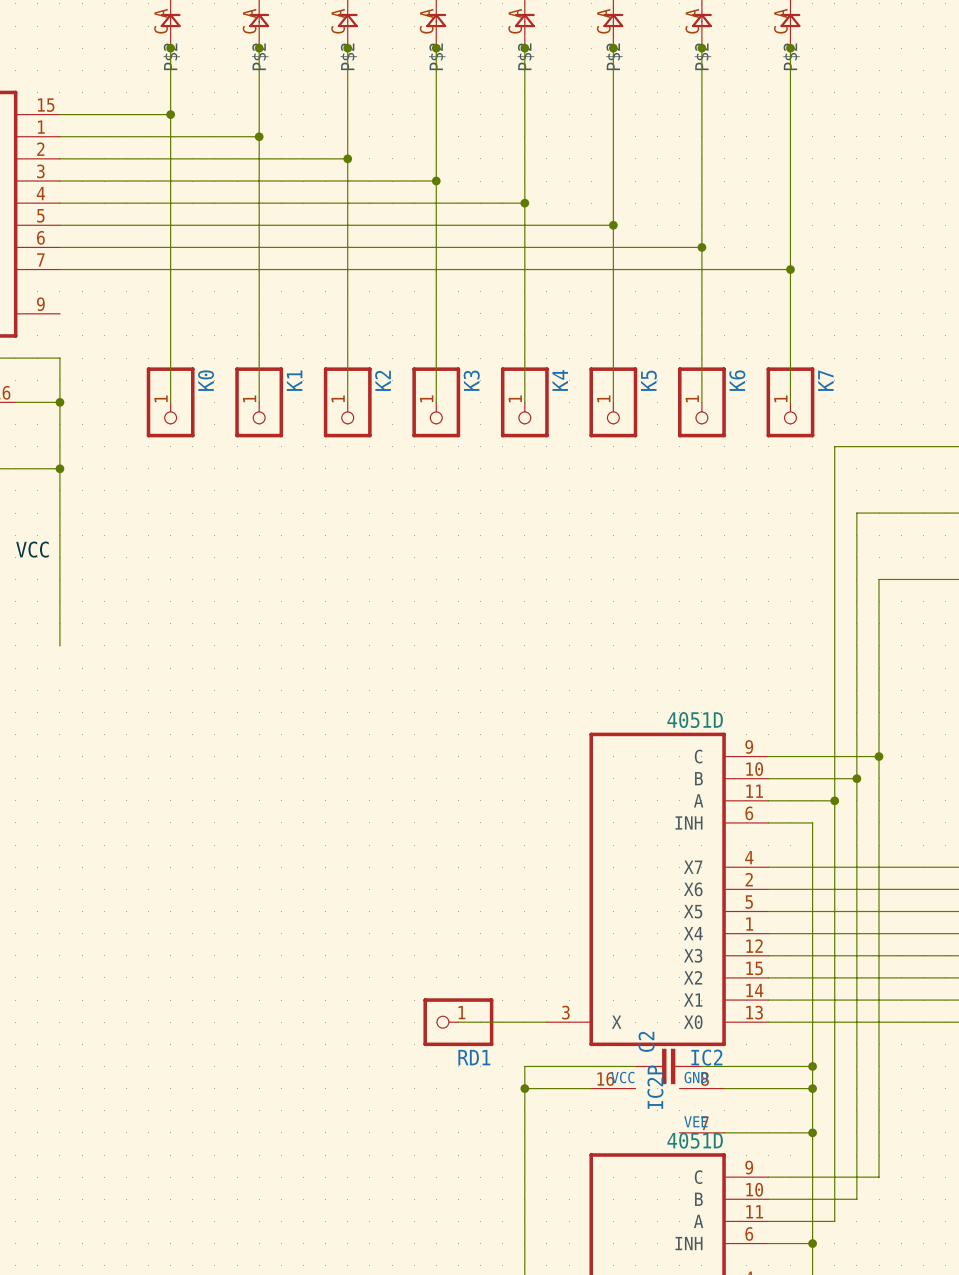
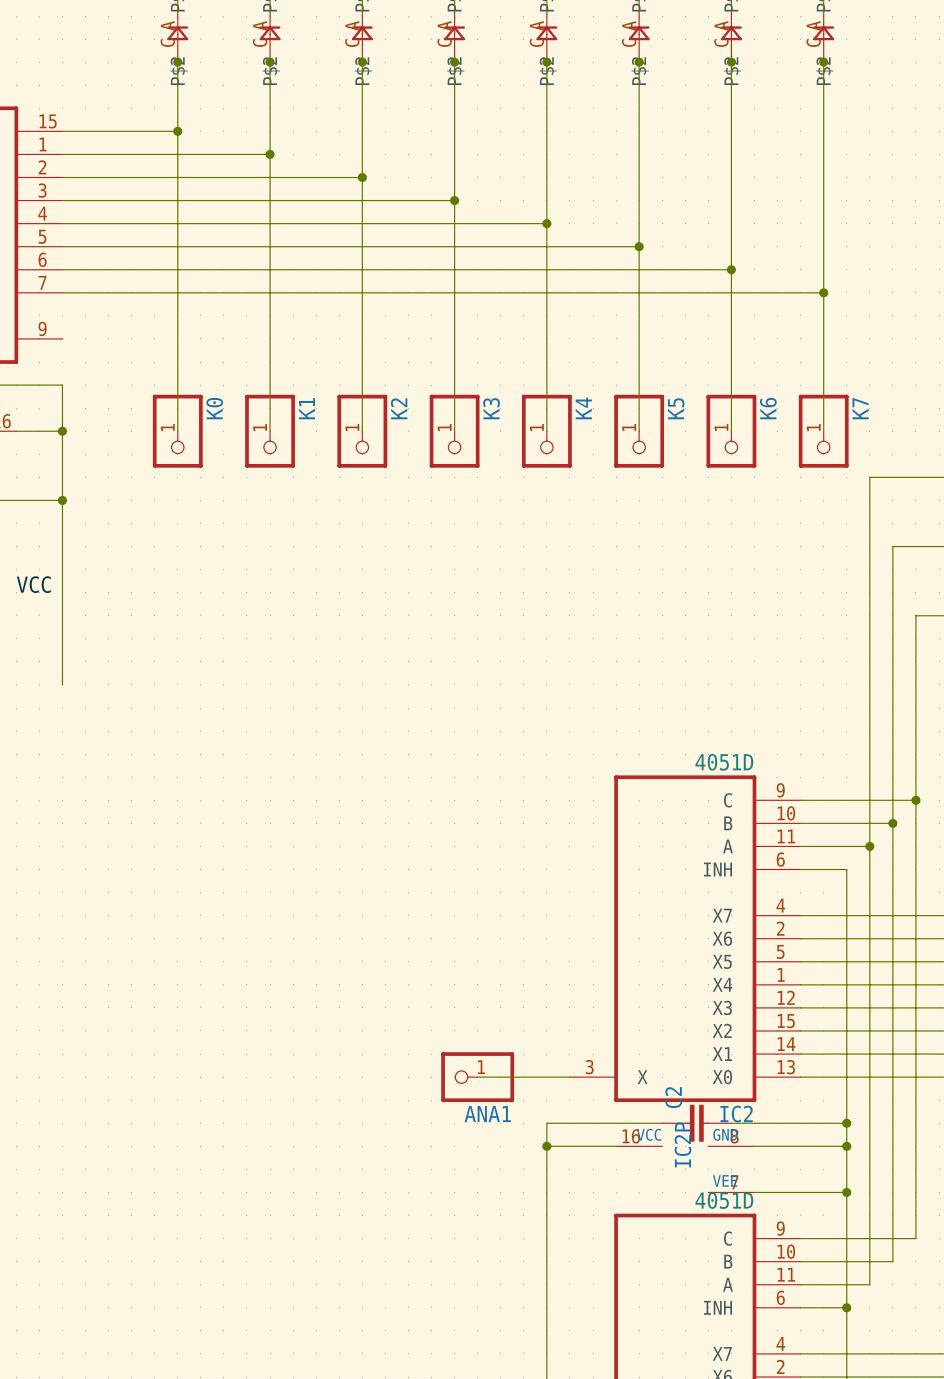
RD1 name: RD1 (474, 1057) -> ANA1 (487, 1114)

